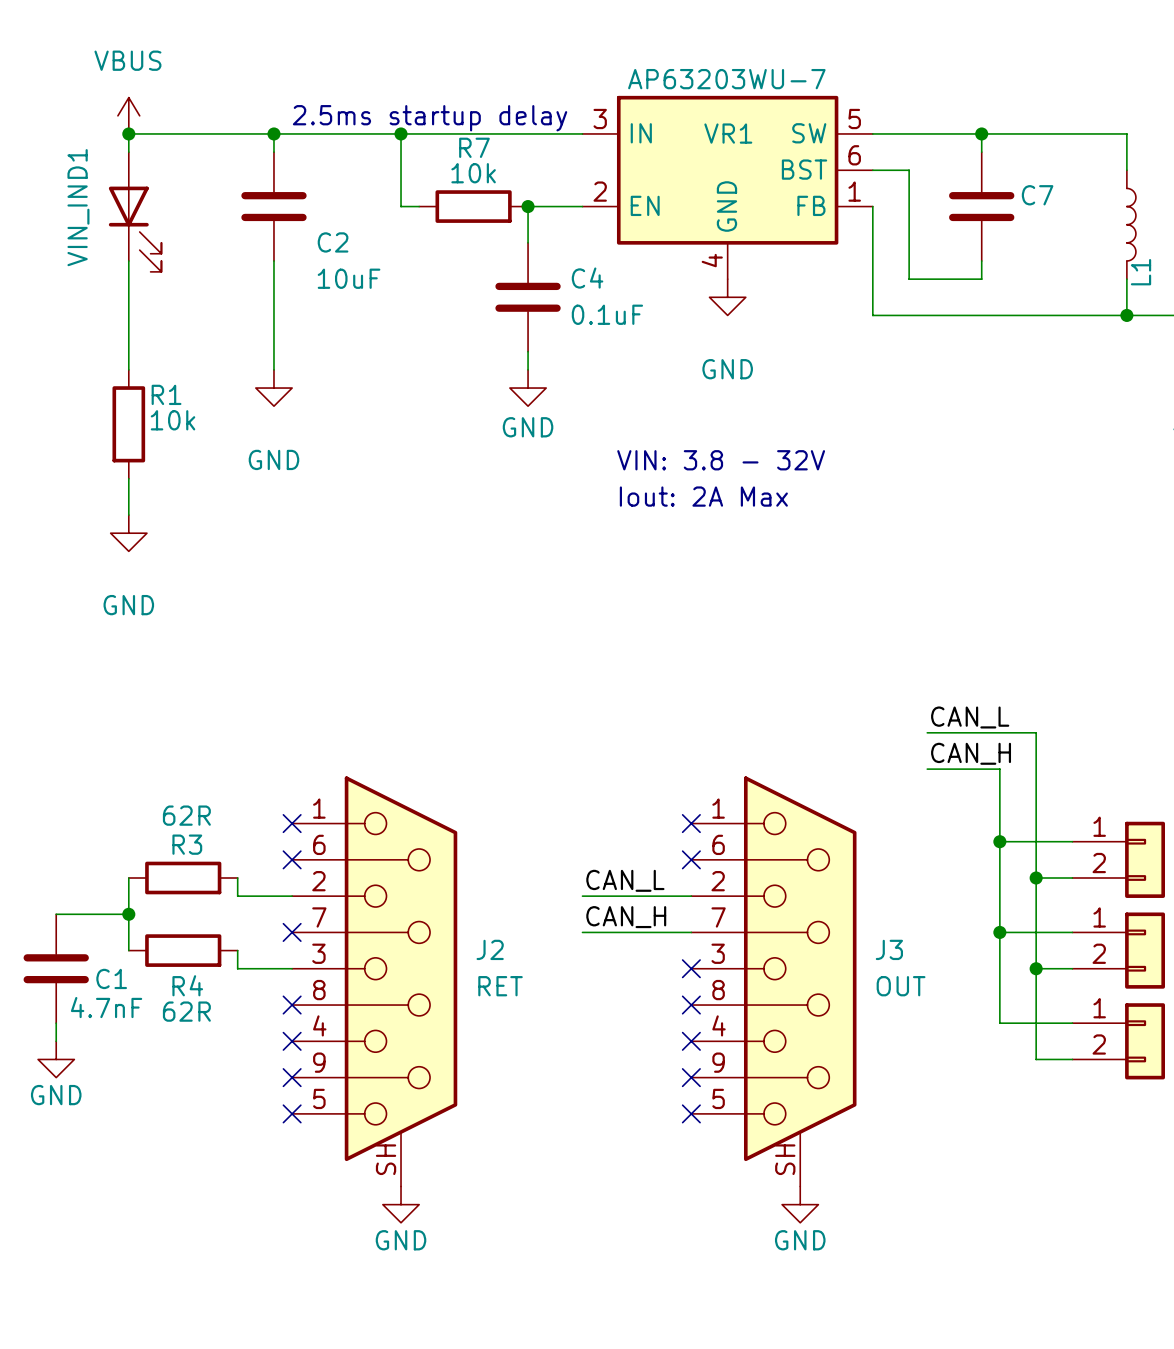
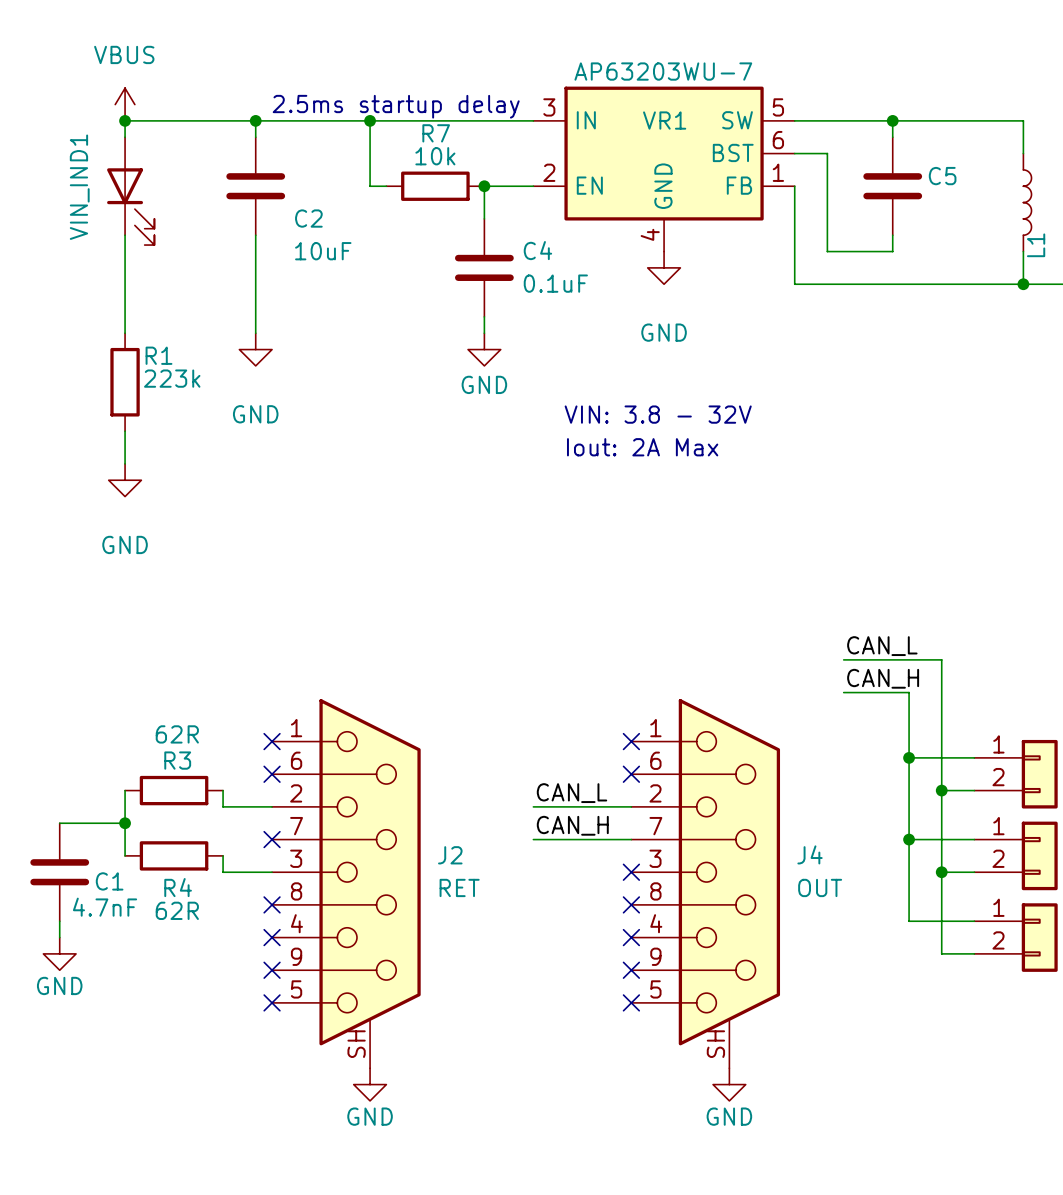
C7 name: C7 (1037, 195) -> C5 (942, 176)
R1 value: 10k (173, 420) -> 223k (172, 378)
J3 name: J3 (889, 949) -> J4 (810, 854)

